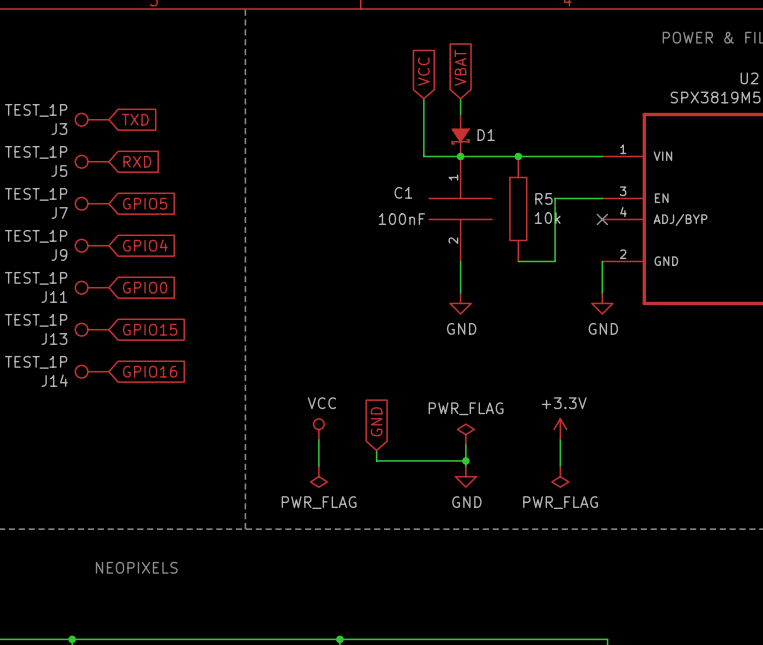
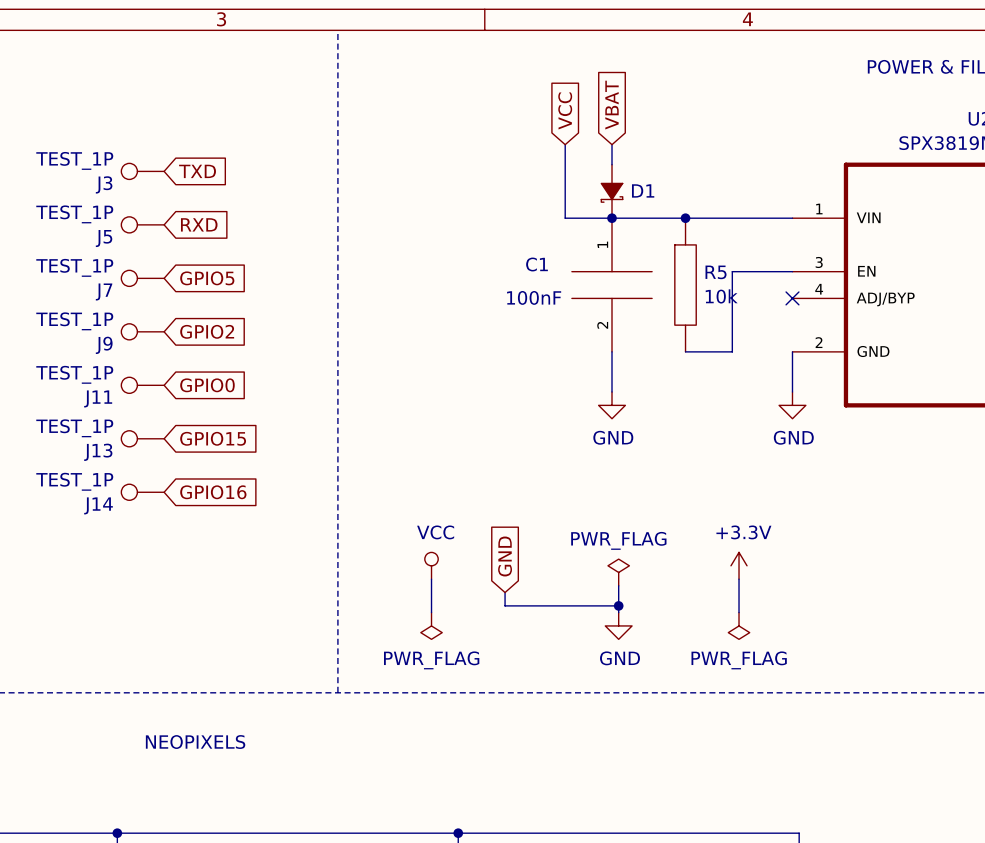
global label: GPIO4 (145, 245) -> GPIO2 (207, 331)

